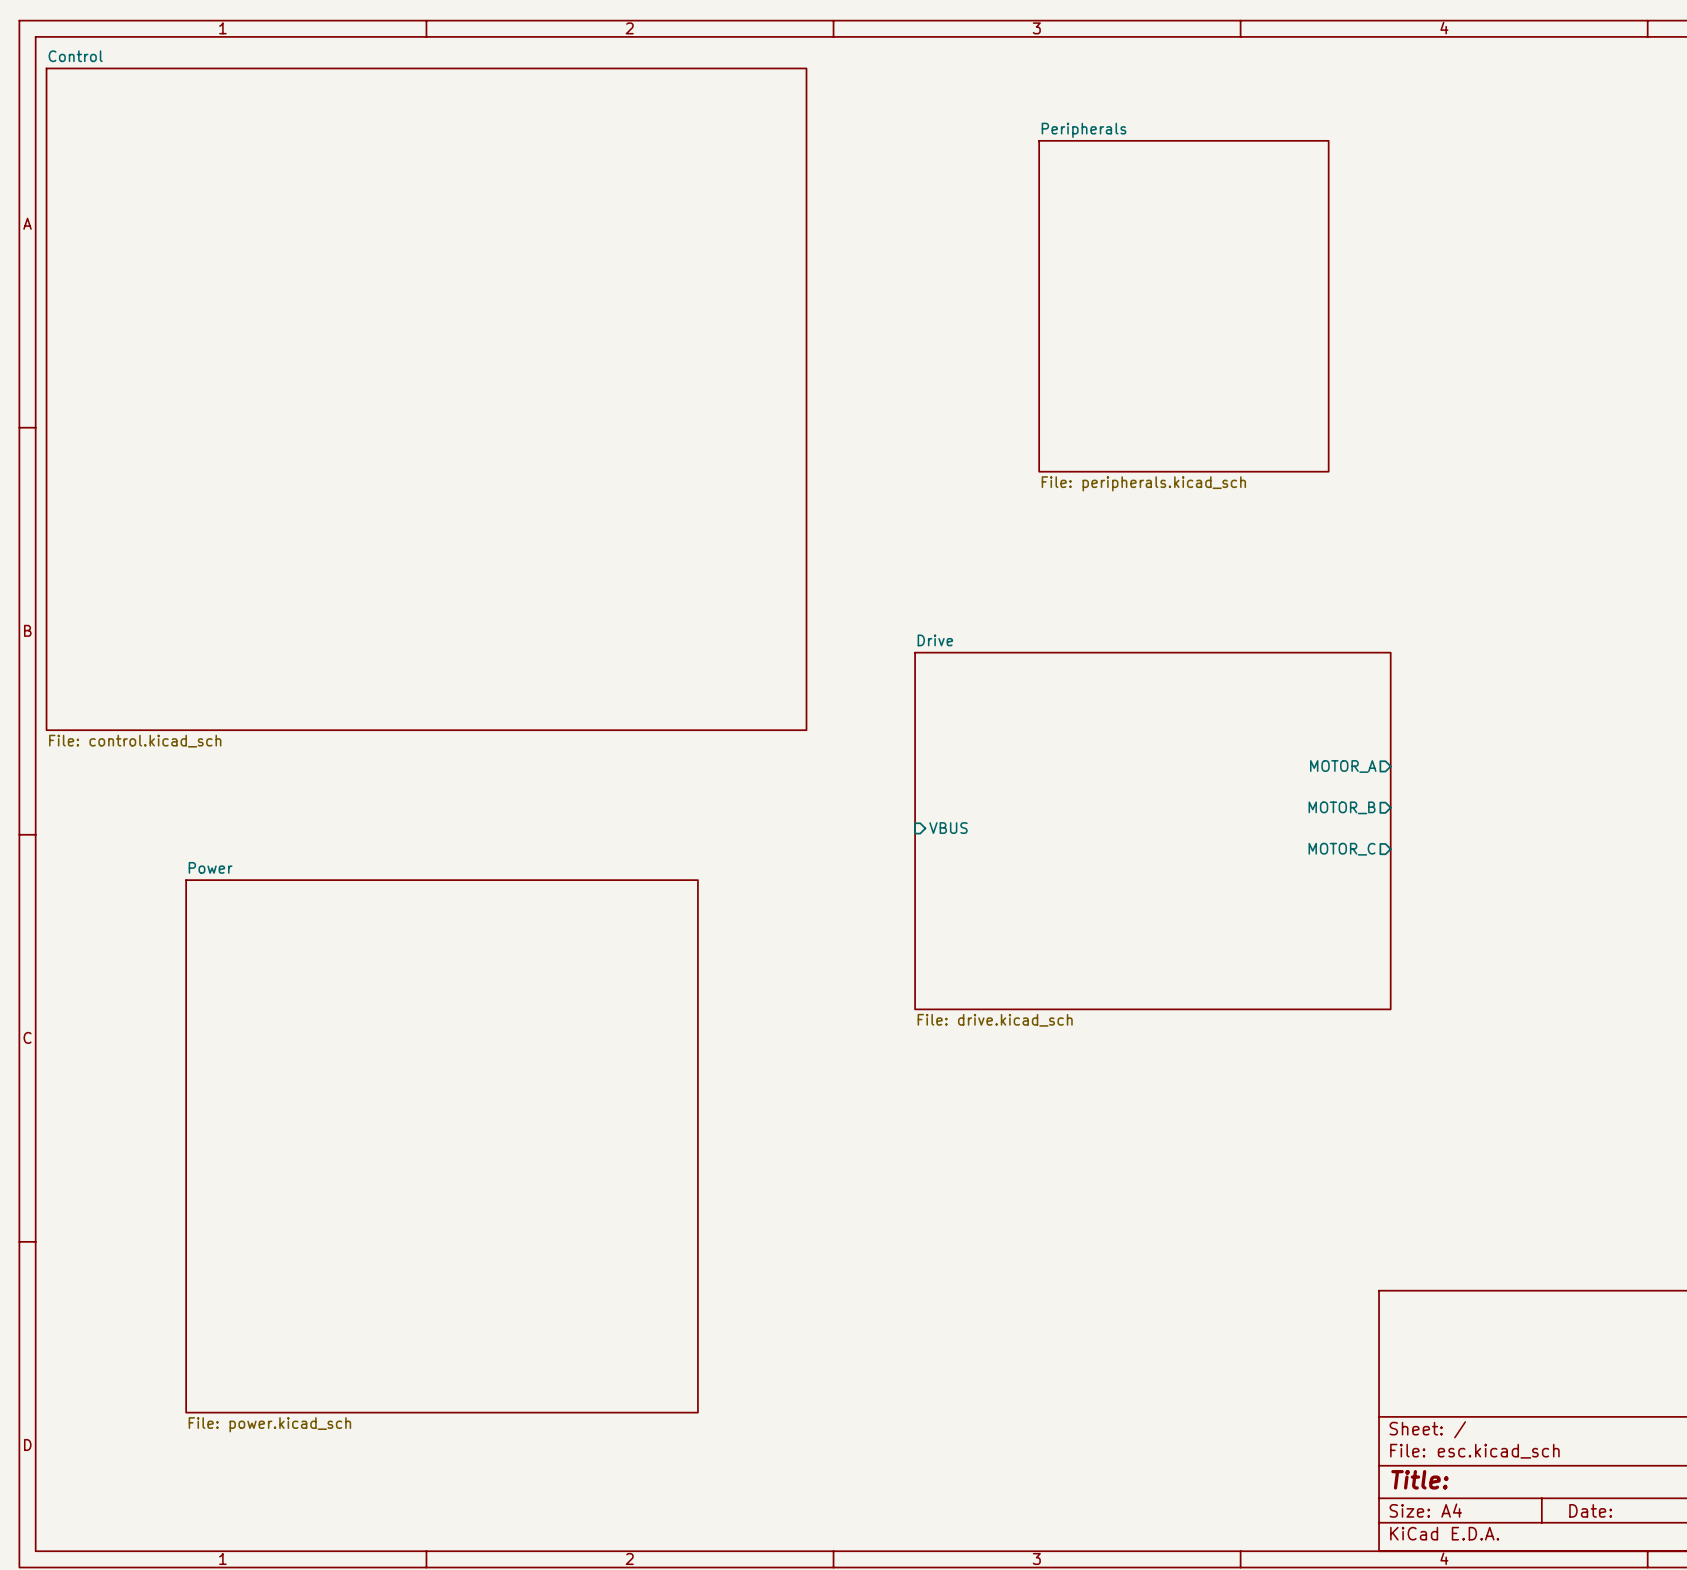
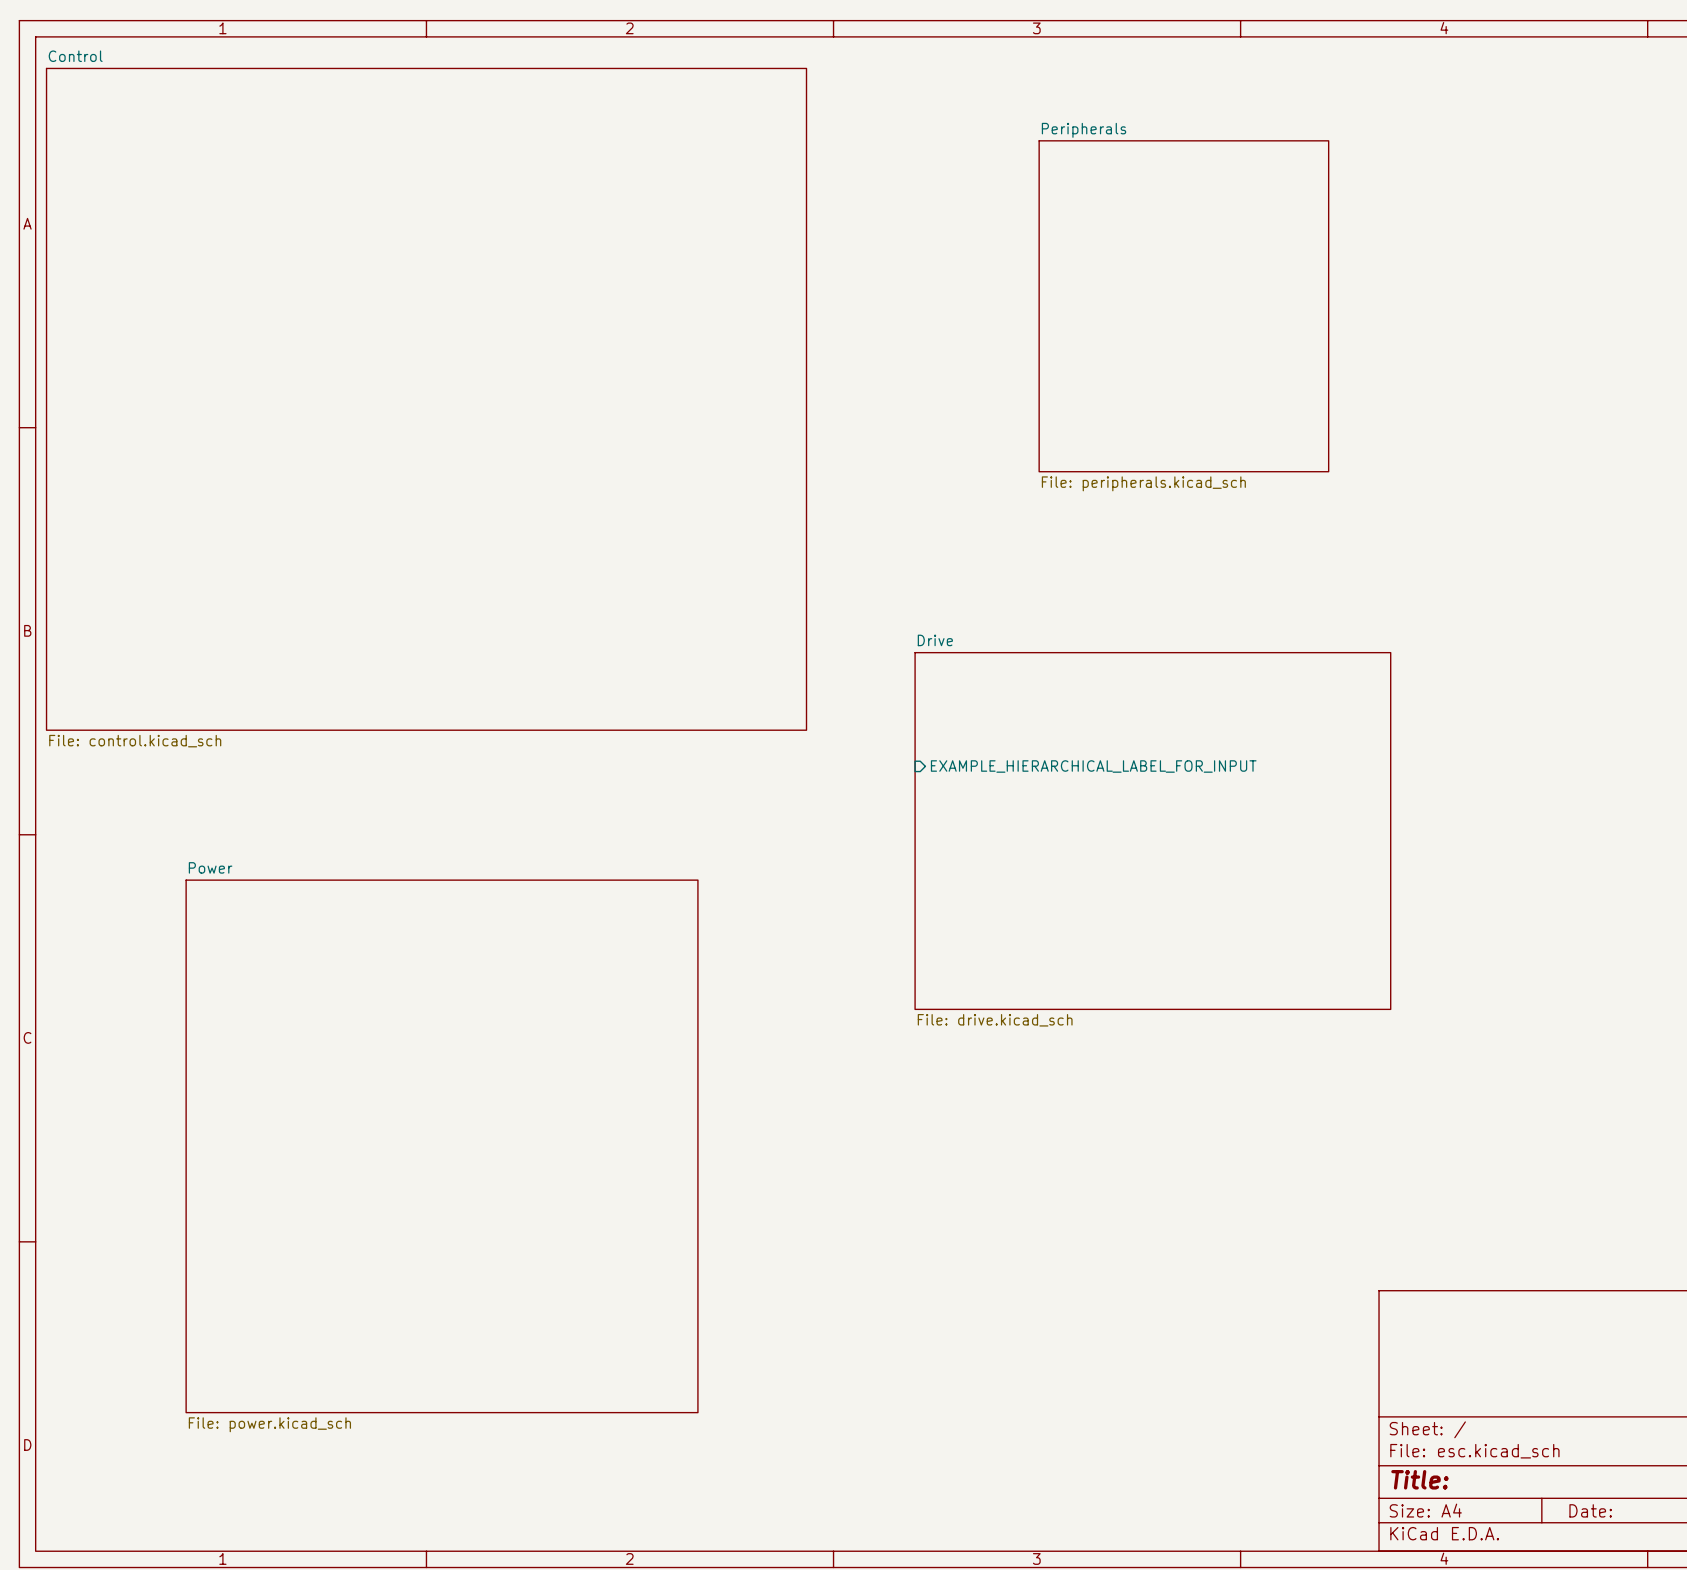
sheet pin: none -> EXAMPLE_HIERARCHICAL_LABEL_FOR_INPUT (1093, 766)
sheet pin: MOTOR_A (1343, 766) -> none
sheet pin: MOTOR_B (1342, 807) -> none
sheet pin: VBUS (948, 828) -> none
sheet pin: MOTOR_C (1342, 849) -> none

